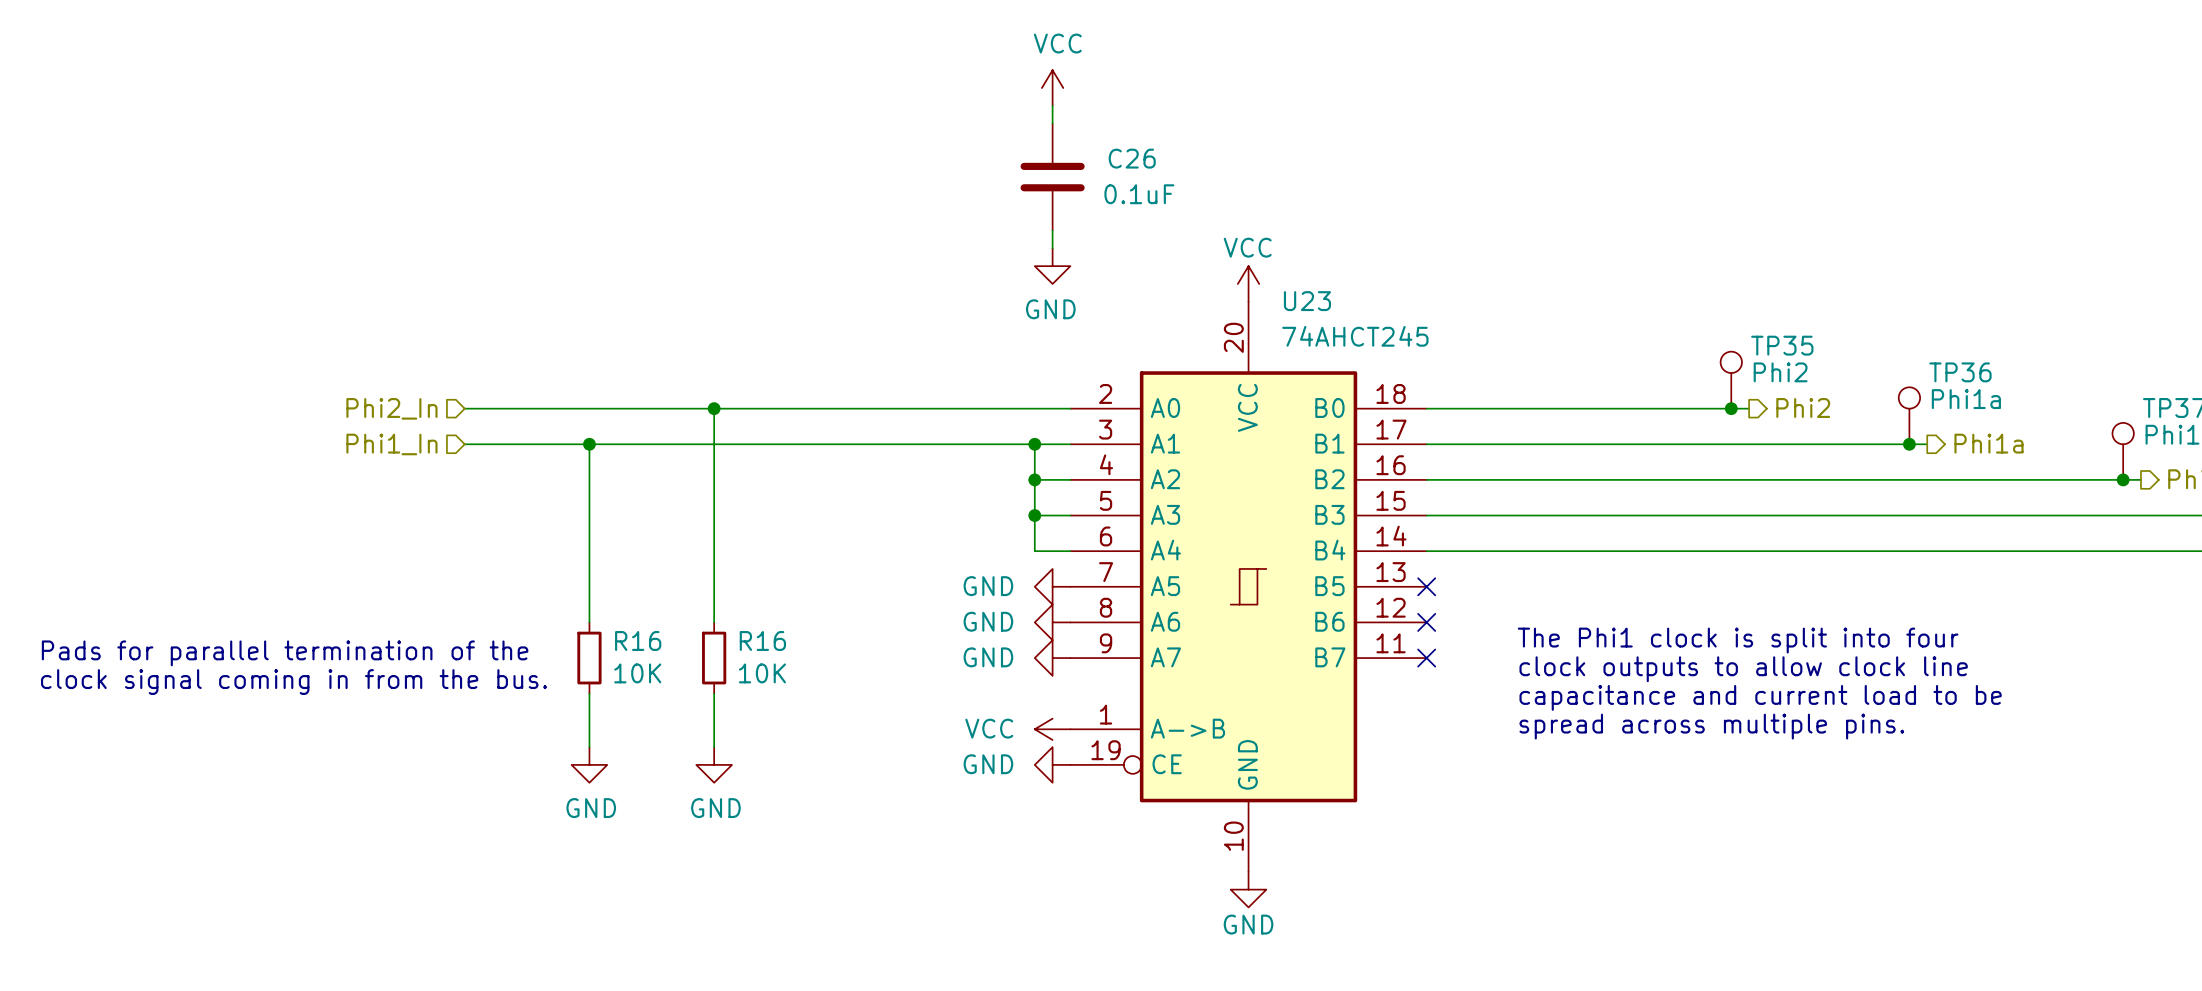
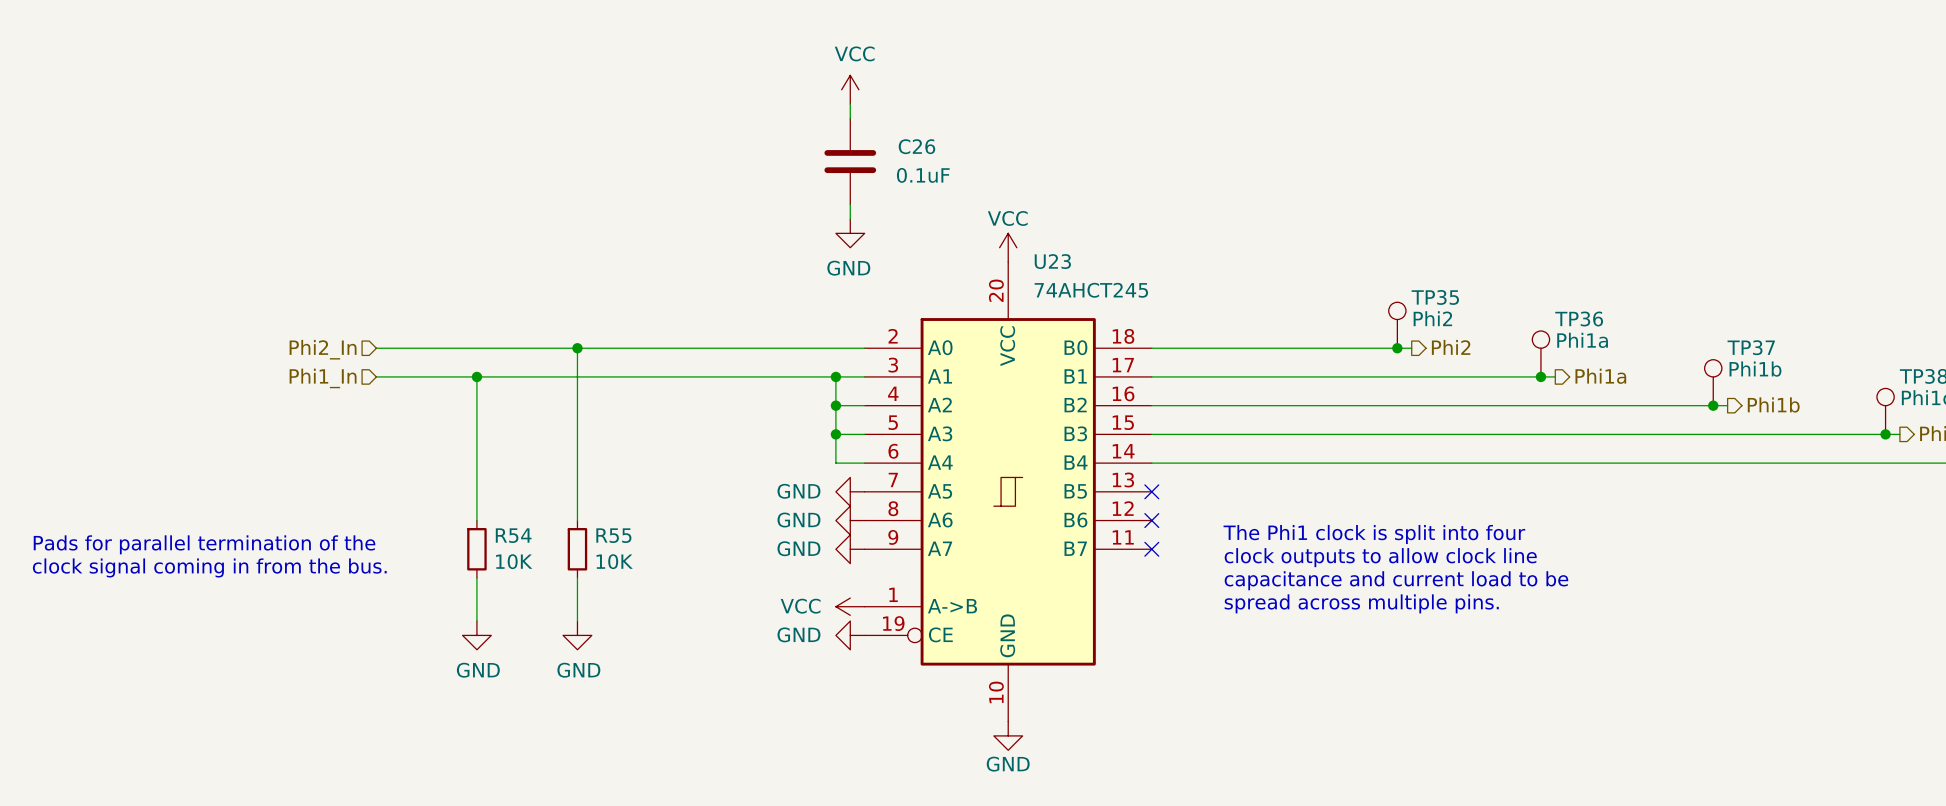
R16 name: R16 (638, 640) -> R54 (513, 535)
R16 name: R16 (762, 640) -> R55 (613, 535)

